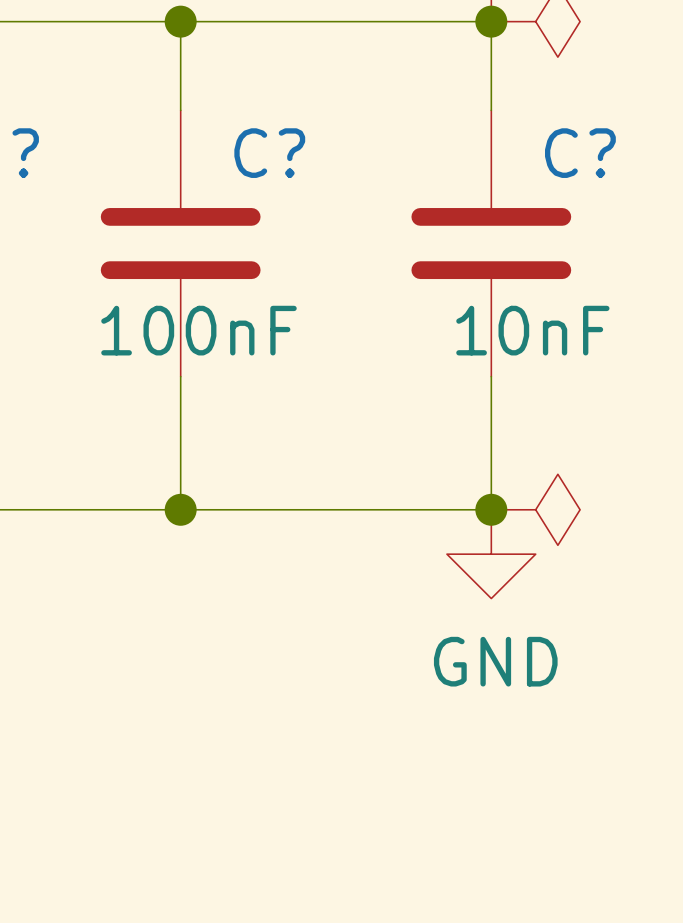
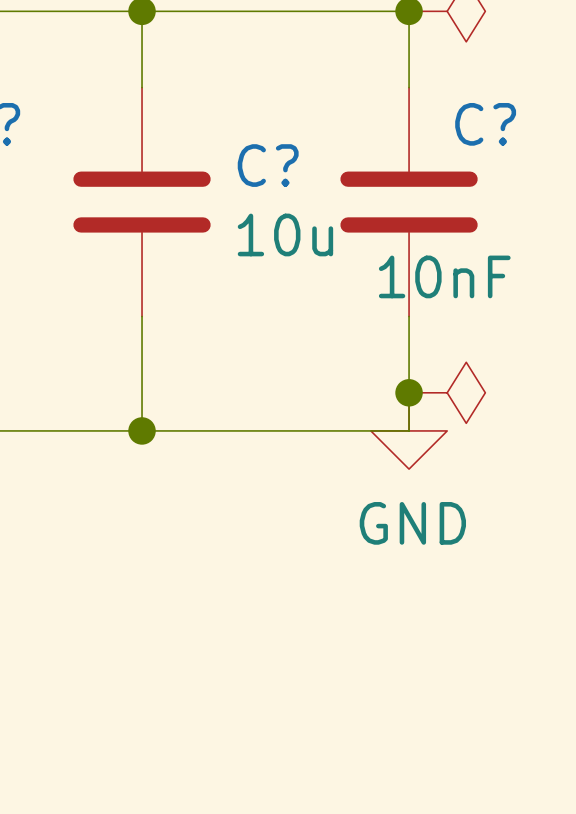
C? name position: C? (269, 153) -> C? (268, 165)
C? value: 100nF (198, 330) -> 10u (285, 234)
junction position: (491, 509) -> (409, 392)
power symbol position: (535, 509) -> (447, 392)
power symbol position: GND (491, 554) -> GND (409, 430)

